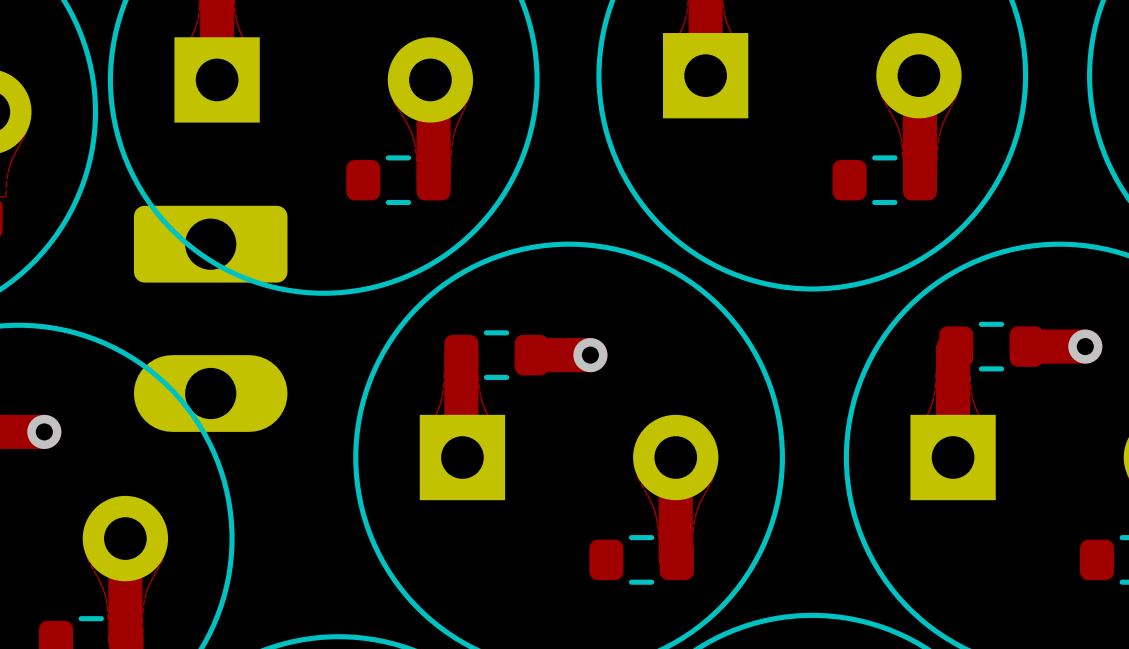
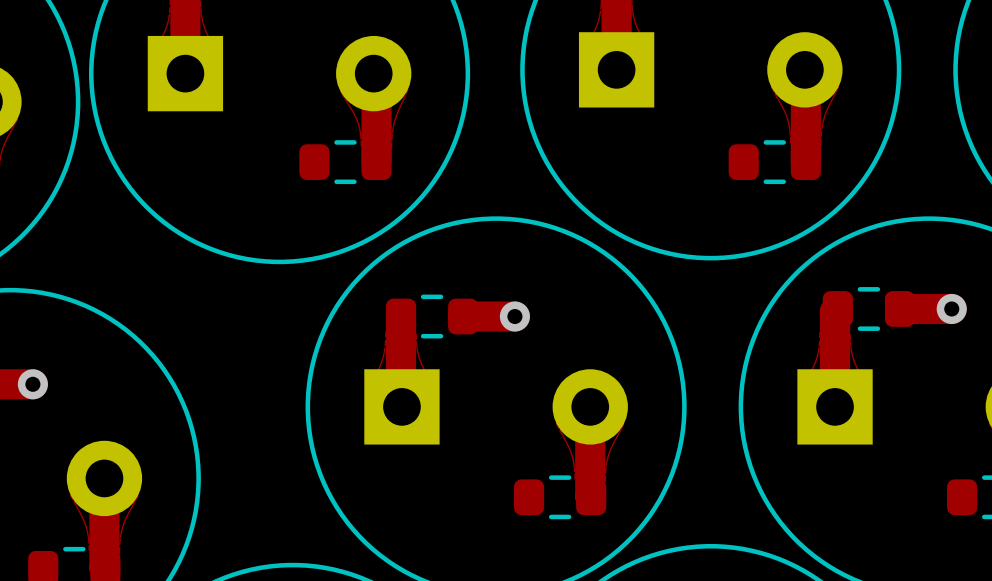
part: (210, 318) -> none

